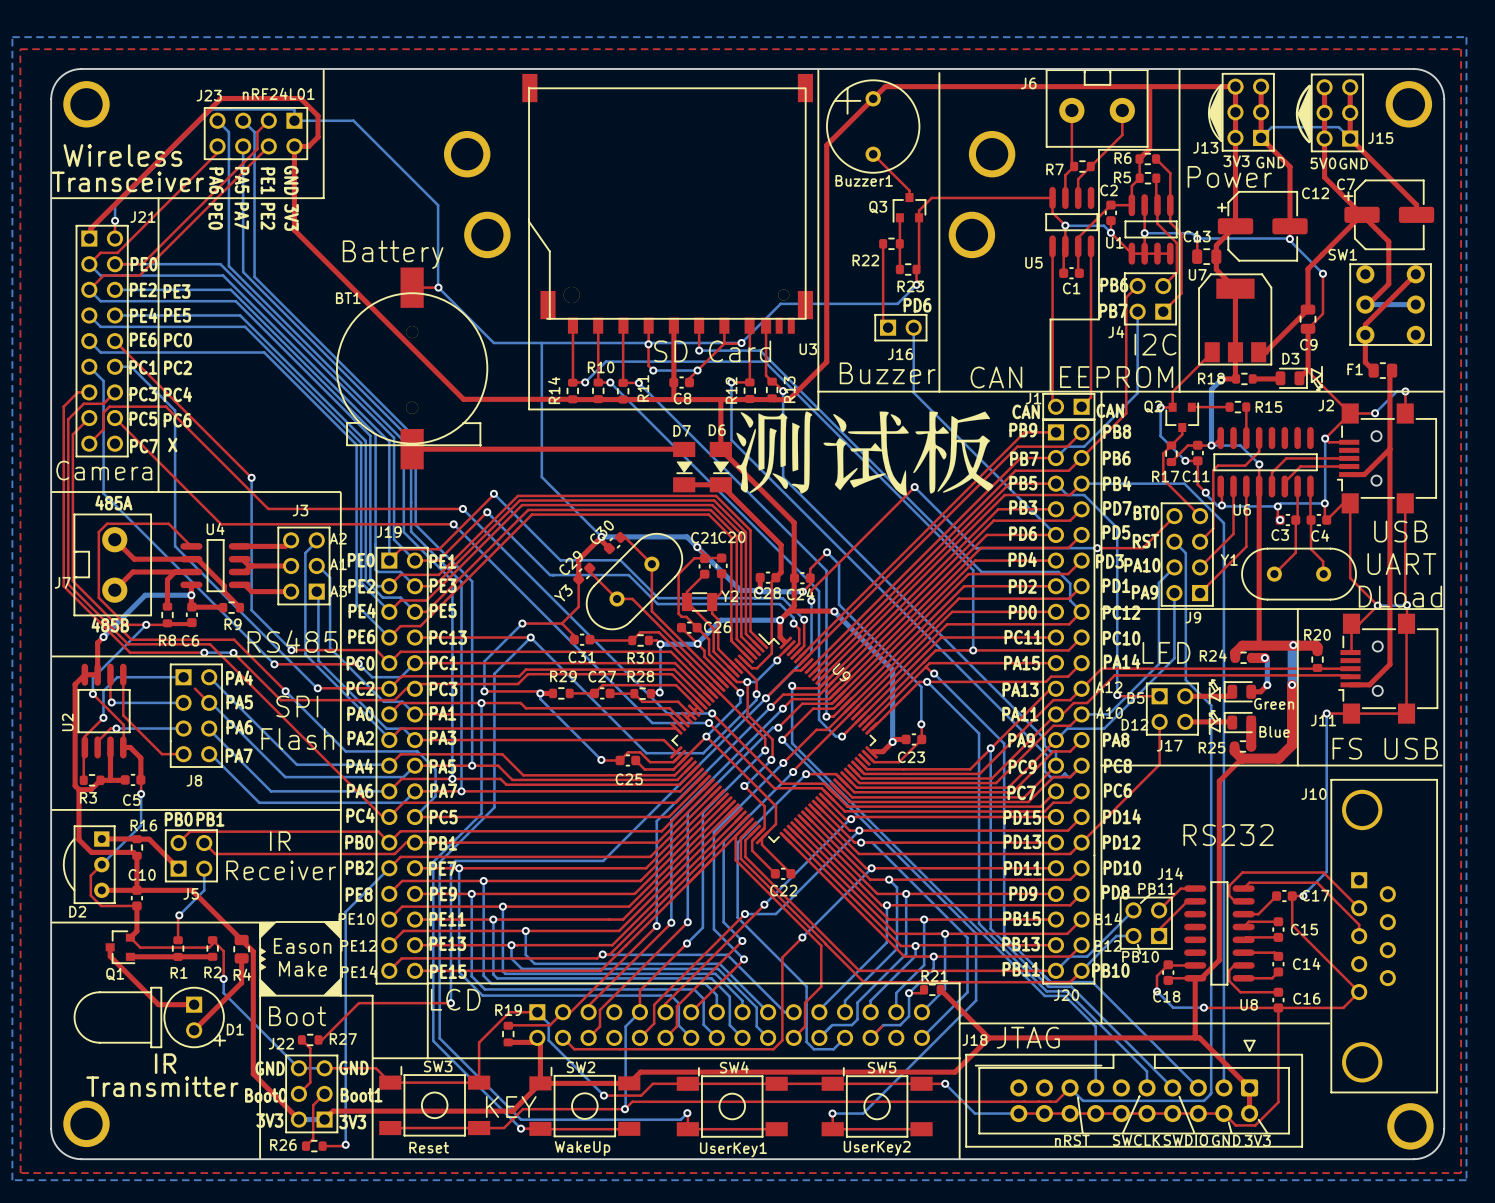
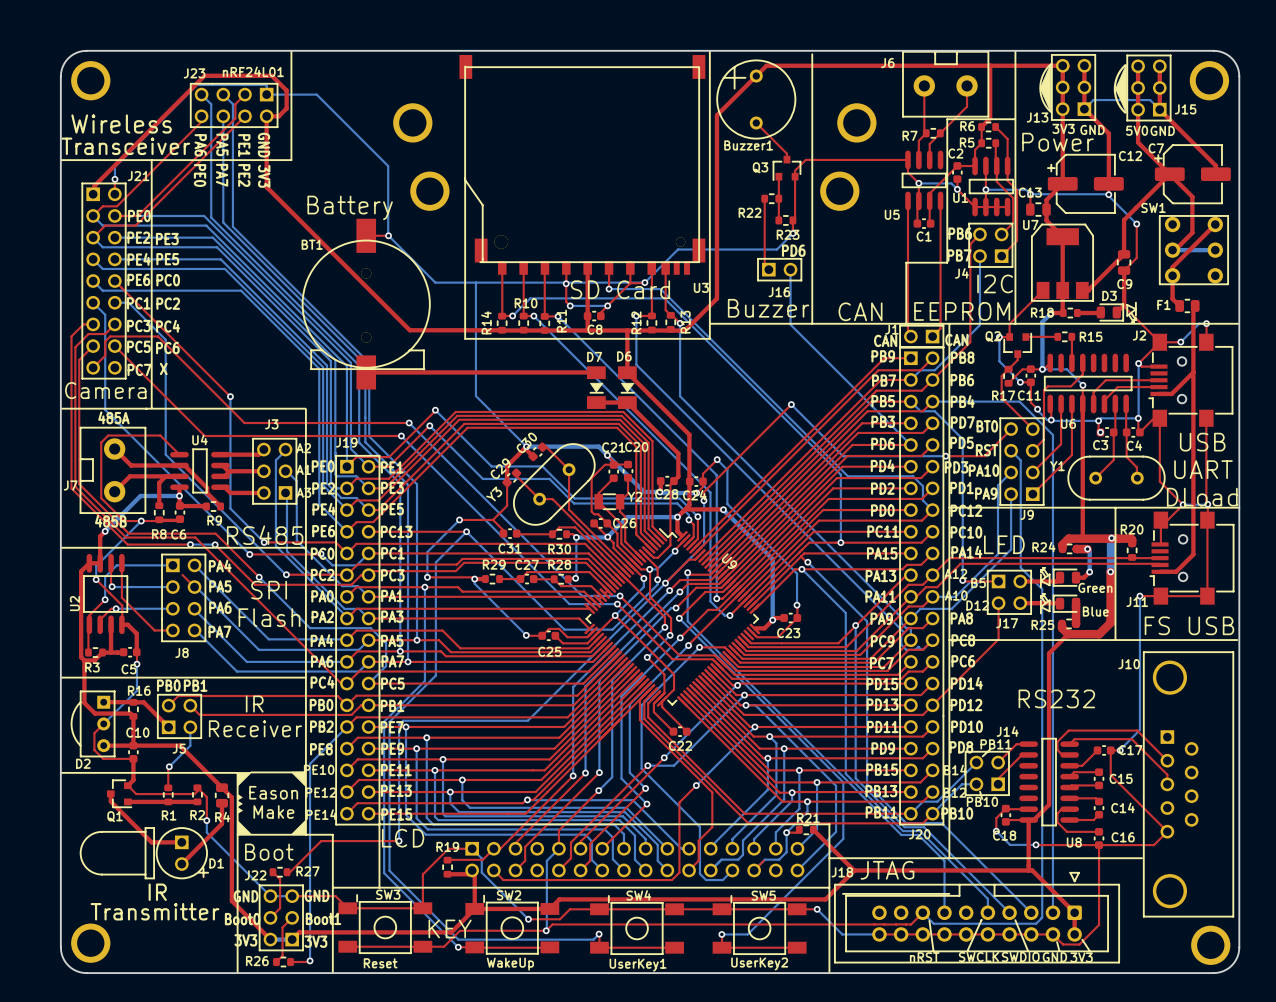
bottom zone outline: (12, 37) (12, 1180) (1466, 1180) (1466, 37) (12, 37) -> none
top zone outline: (20, 49) (20, 1173) (1461, 1173) (1461, 49) (20, 49) -> none
drawing: [736, 411, 994, 496] -> none

